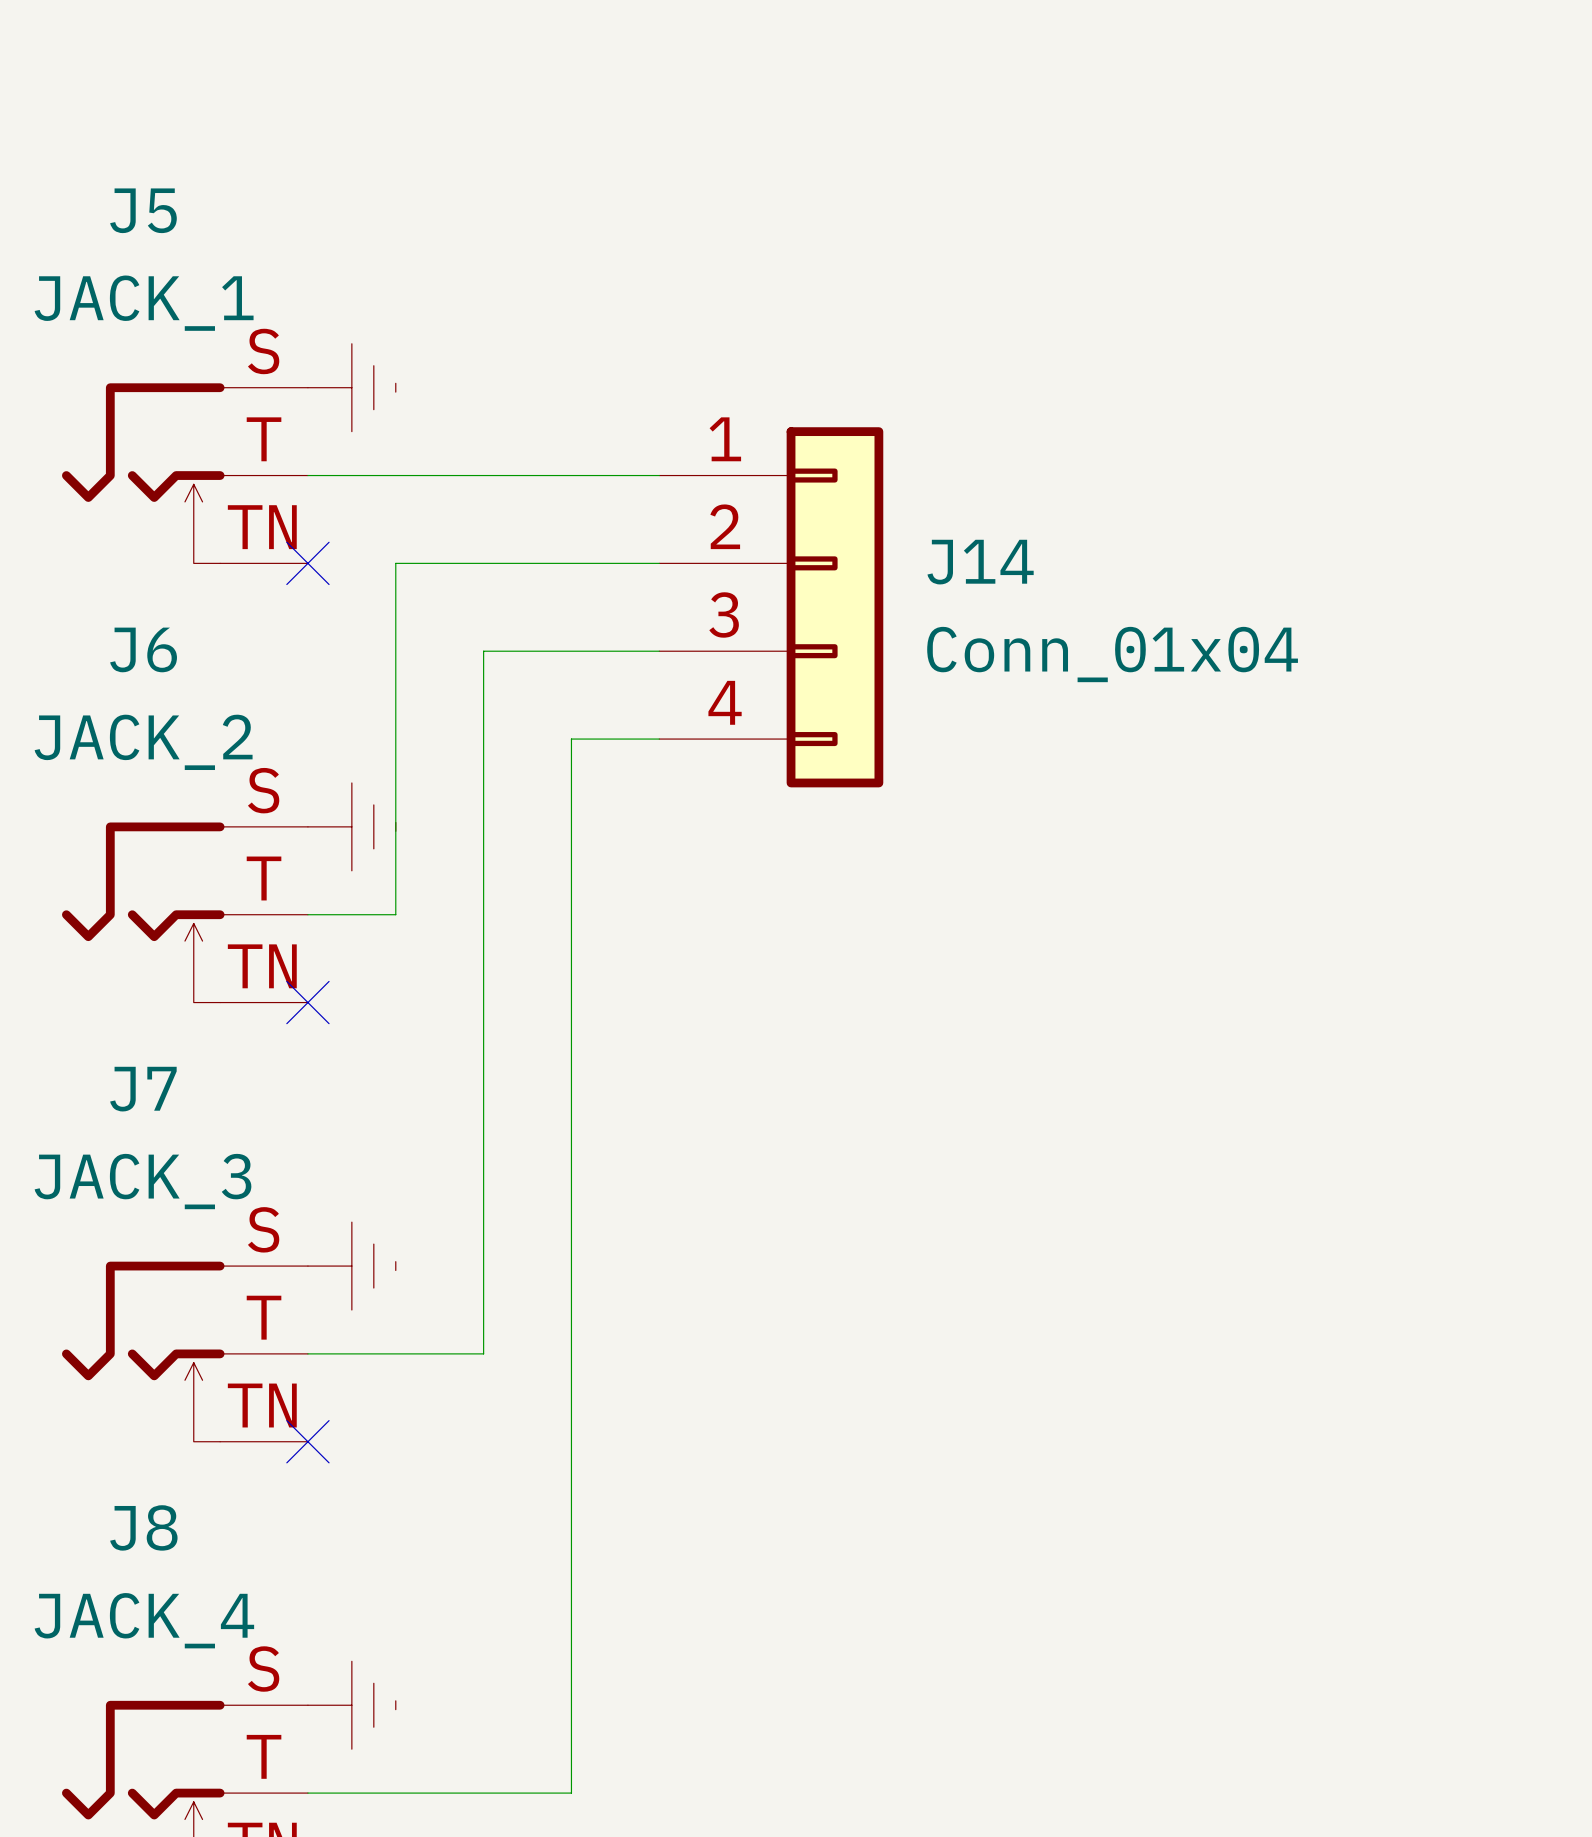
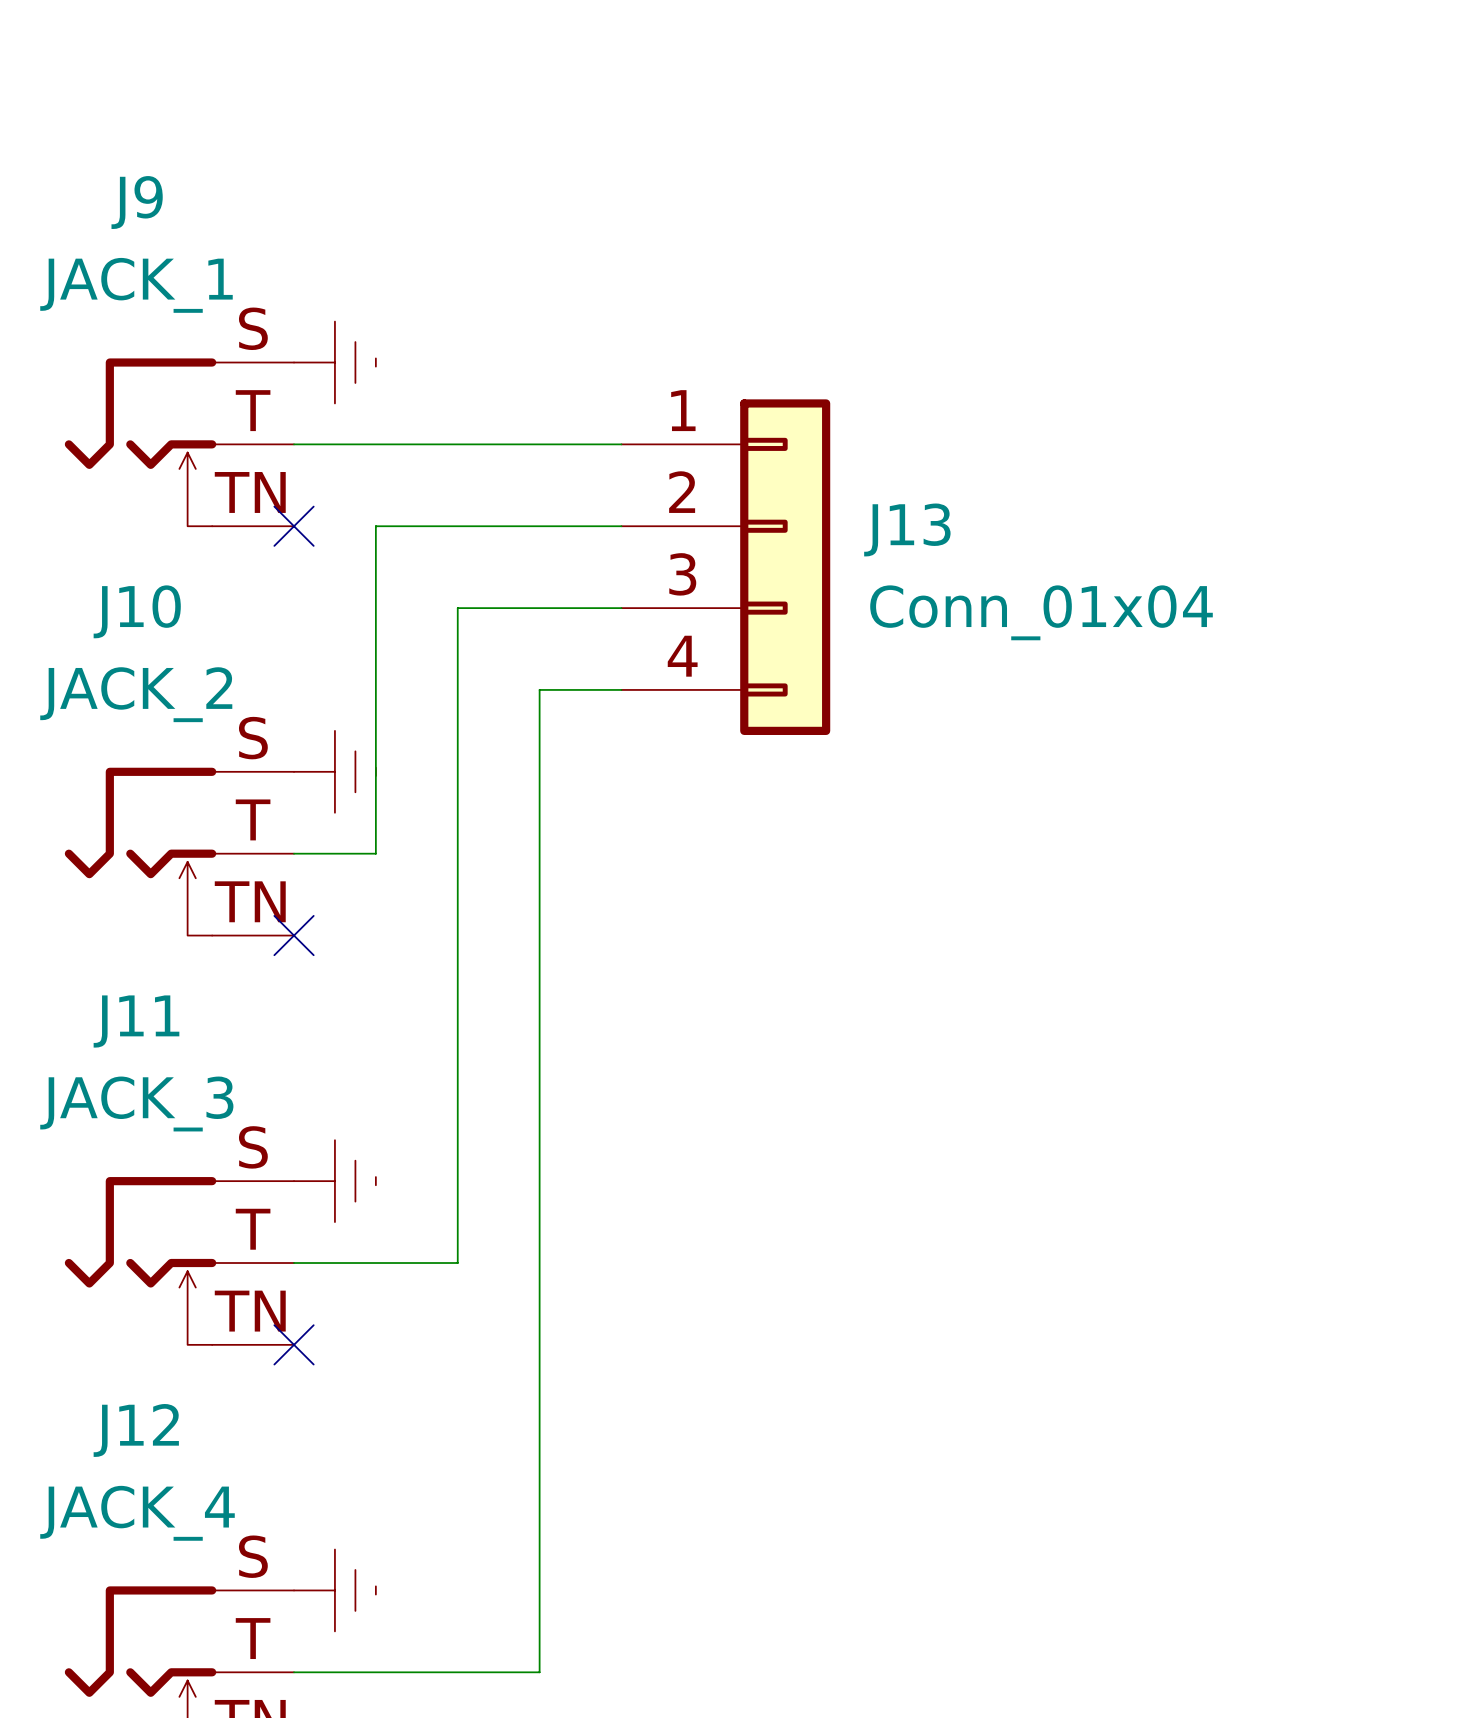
J5 name: J5 (143, 210) -> J9 (137, 202)
J14 name: J14 (980, 562) -> J13 (907, 529)
J6 name: J6 (143, 649) -> J10 (137, 611)
J7 name: J7 (143, 1089) -> J11 (136, 1021)
J8 name: J8 (143, 1527) -> J12 (136, 1430)

